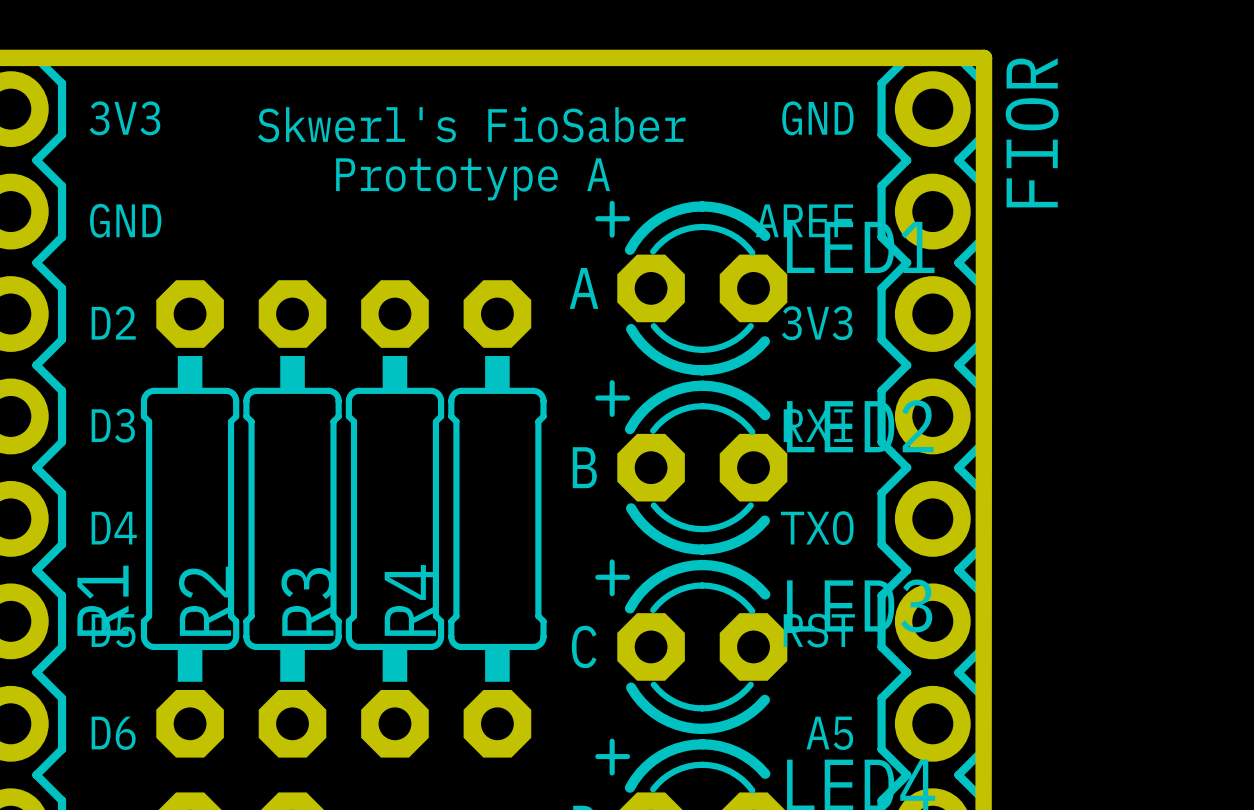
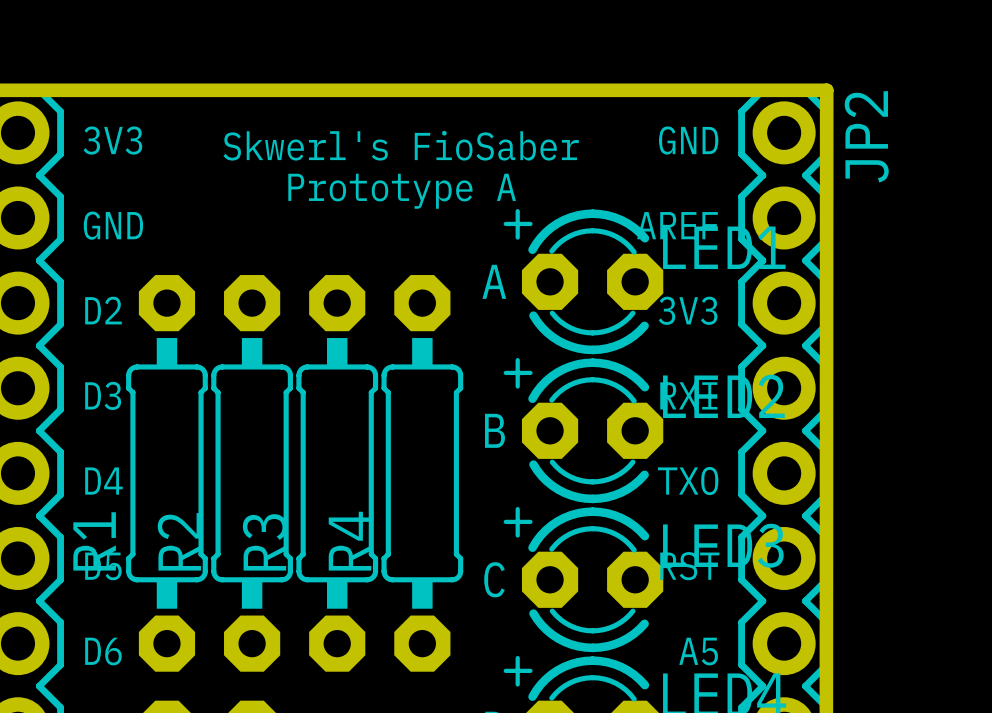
FIOR name: FIOR (1032, 132) -> JP2 (866, 136)

